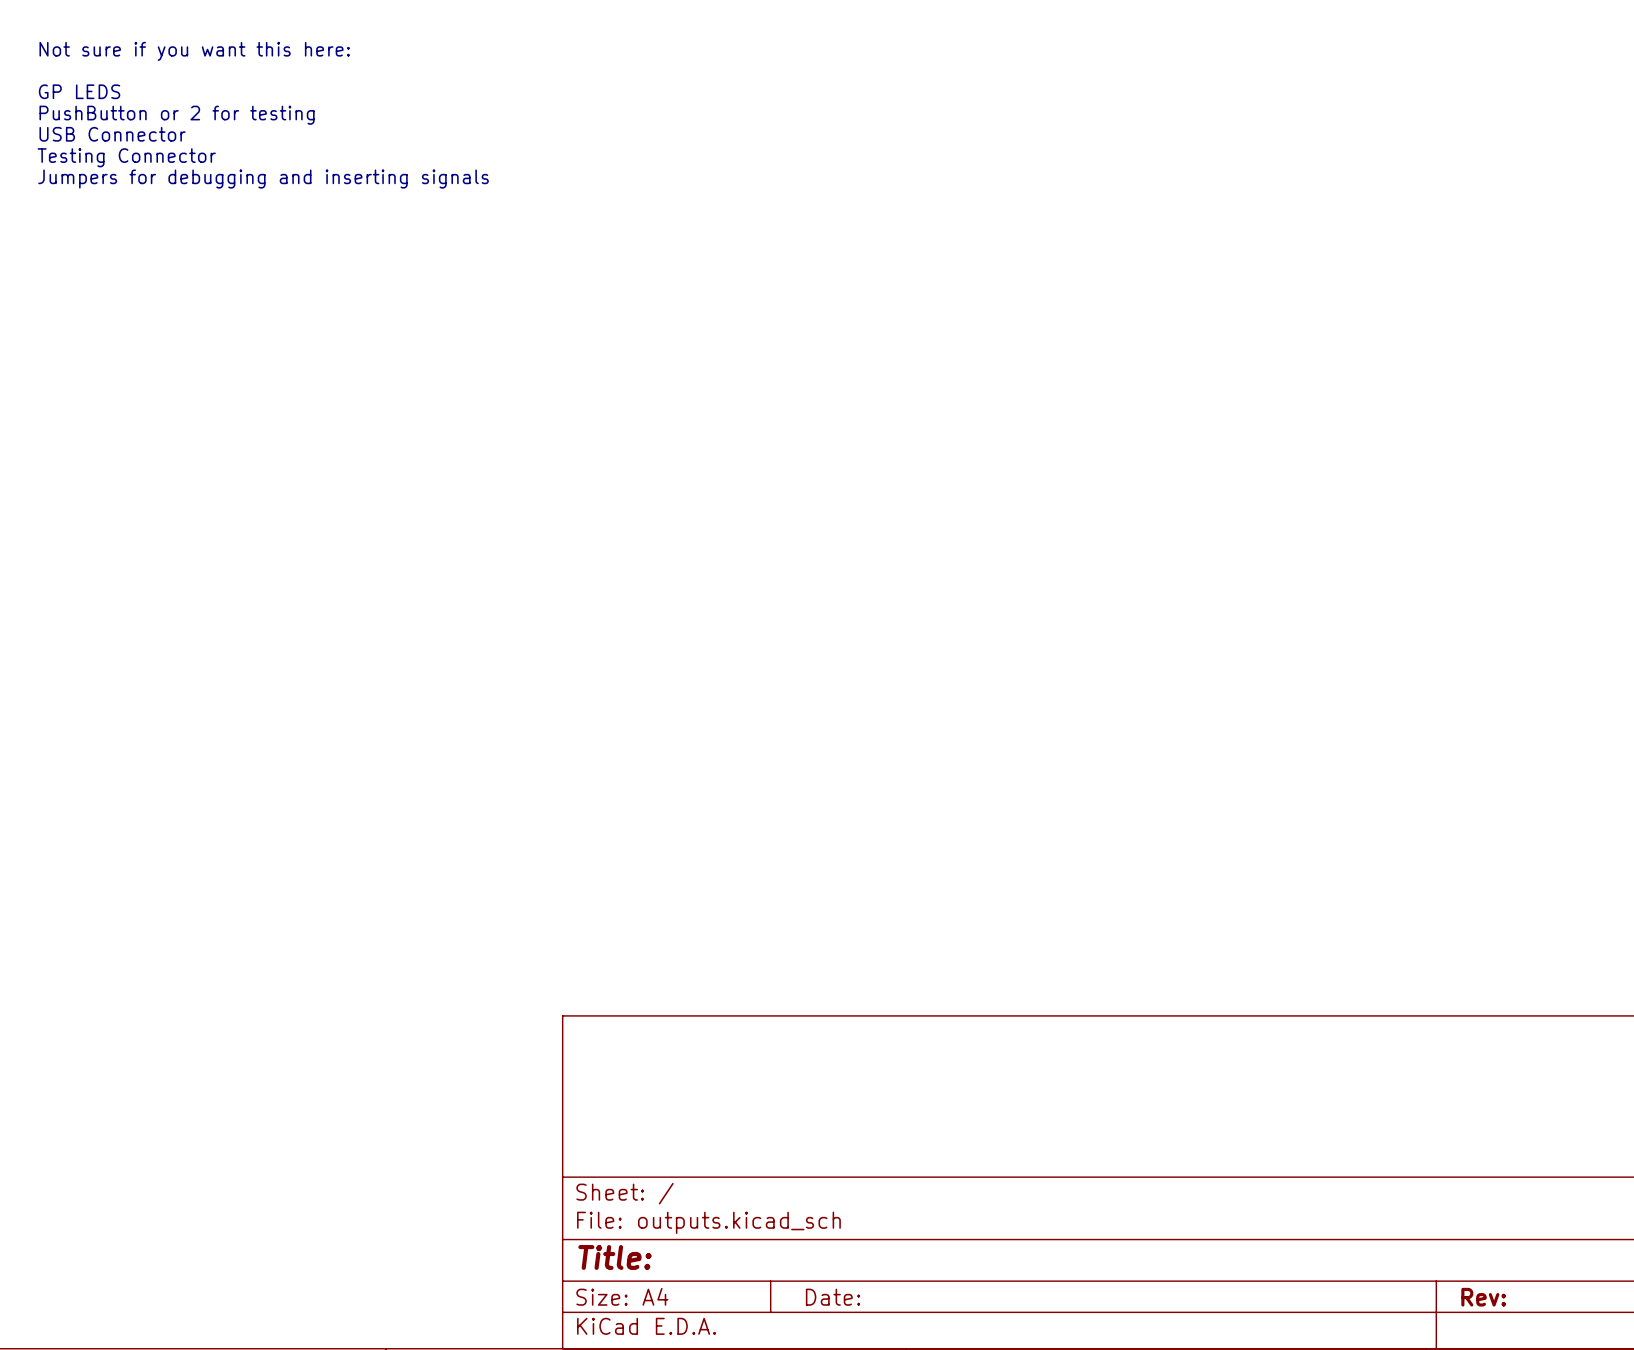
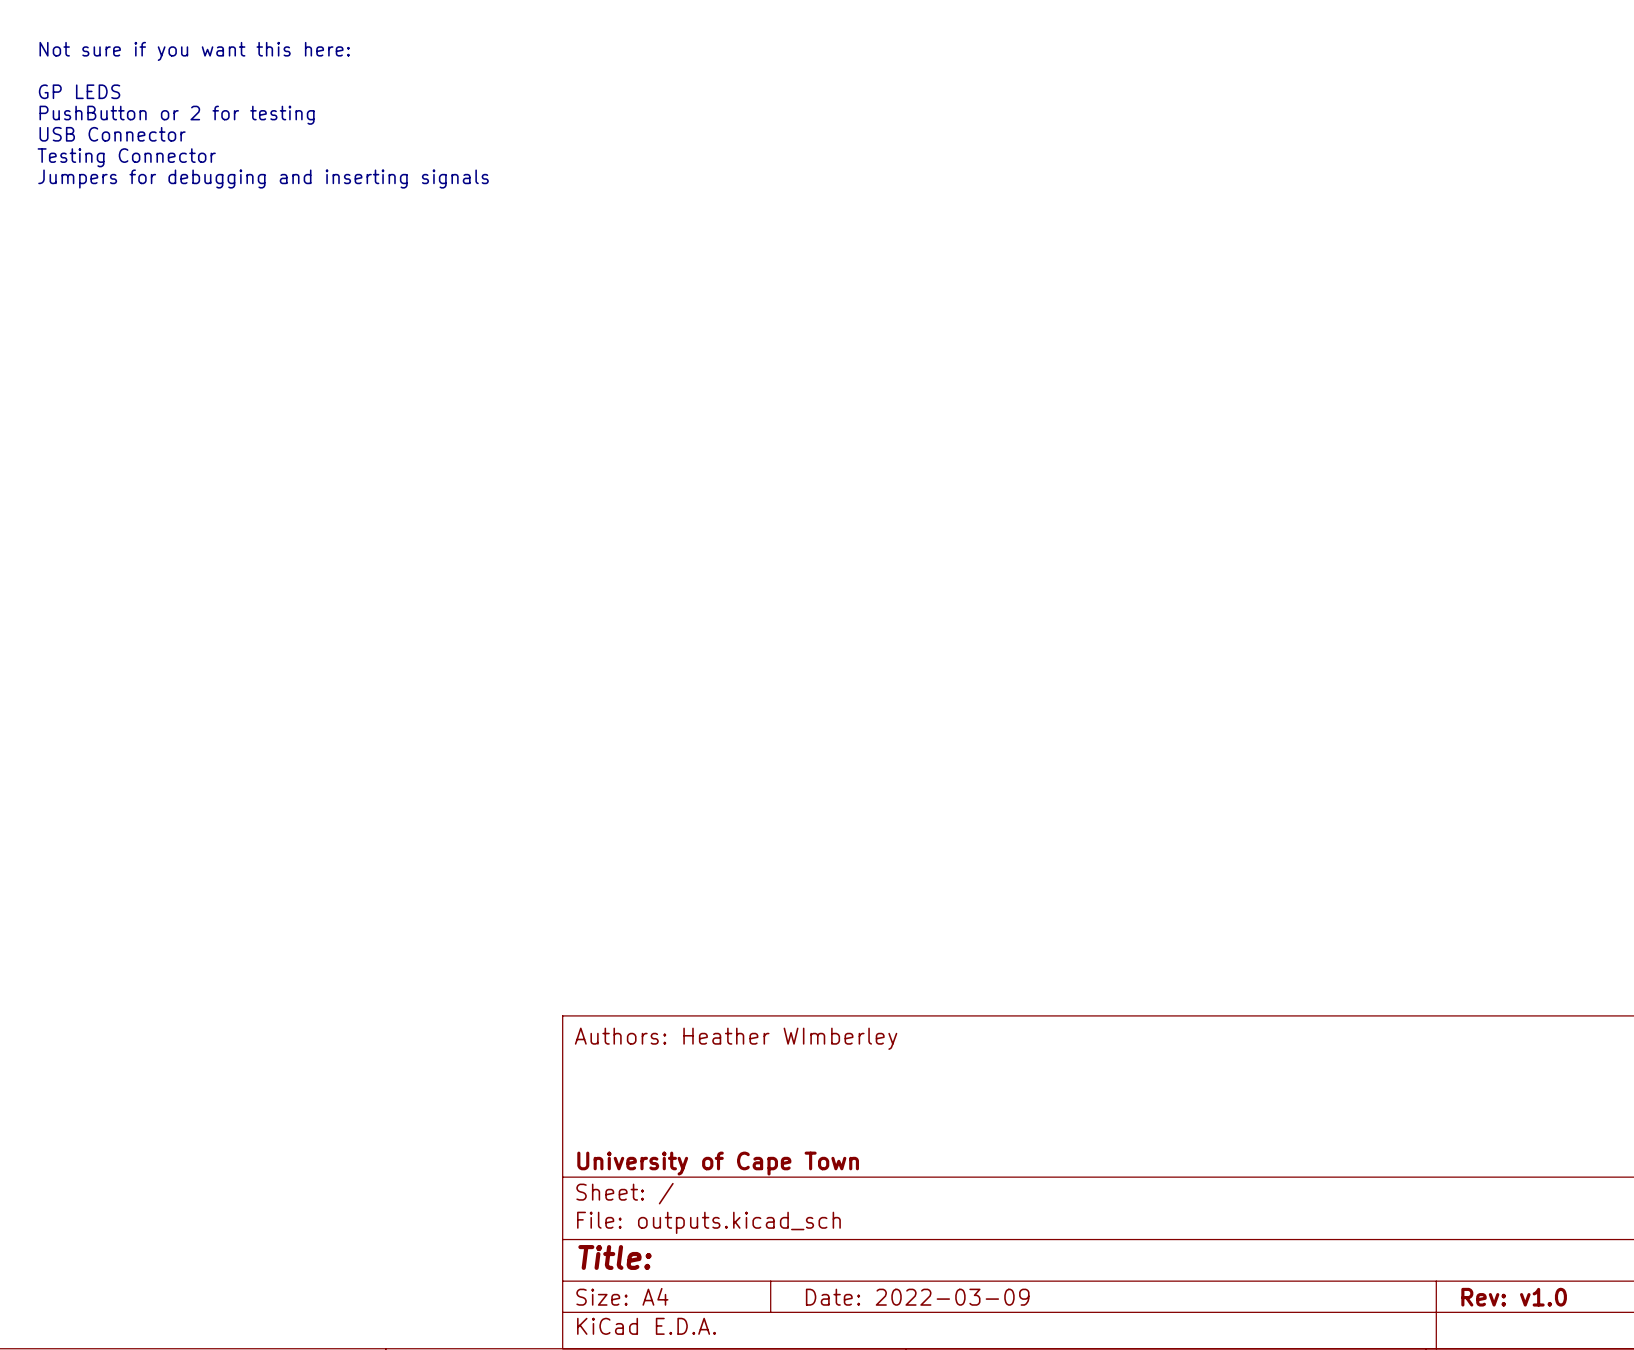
title block: none -> Authors: Heather WImberley (736, 1038)
title block: none -> University of Cape Town (718, 1163)
title block: Date: (833, 1297) -> Date: 2022-03-09 (917, 1297)
title block: Rev: (1483, 1297) -> Rev: v1.0 (1514, 1297)

